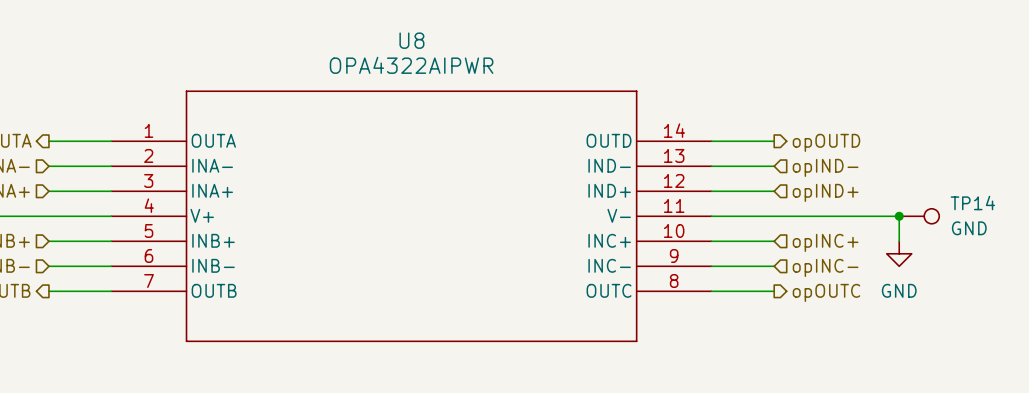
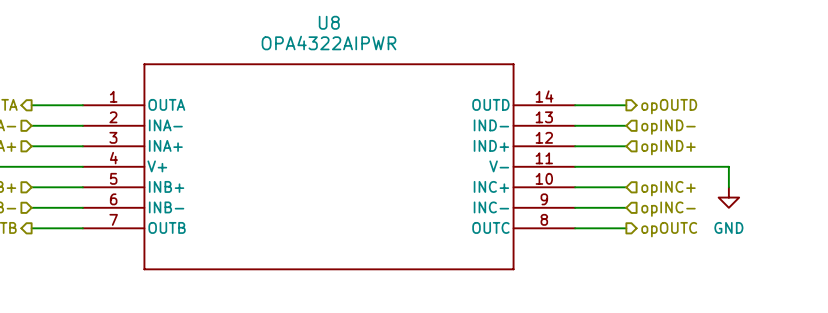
junction: (899, 216) -> none
TP14: GND (919, 216) -> none

